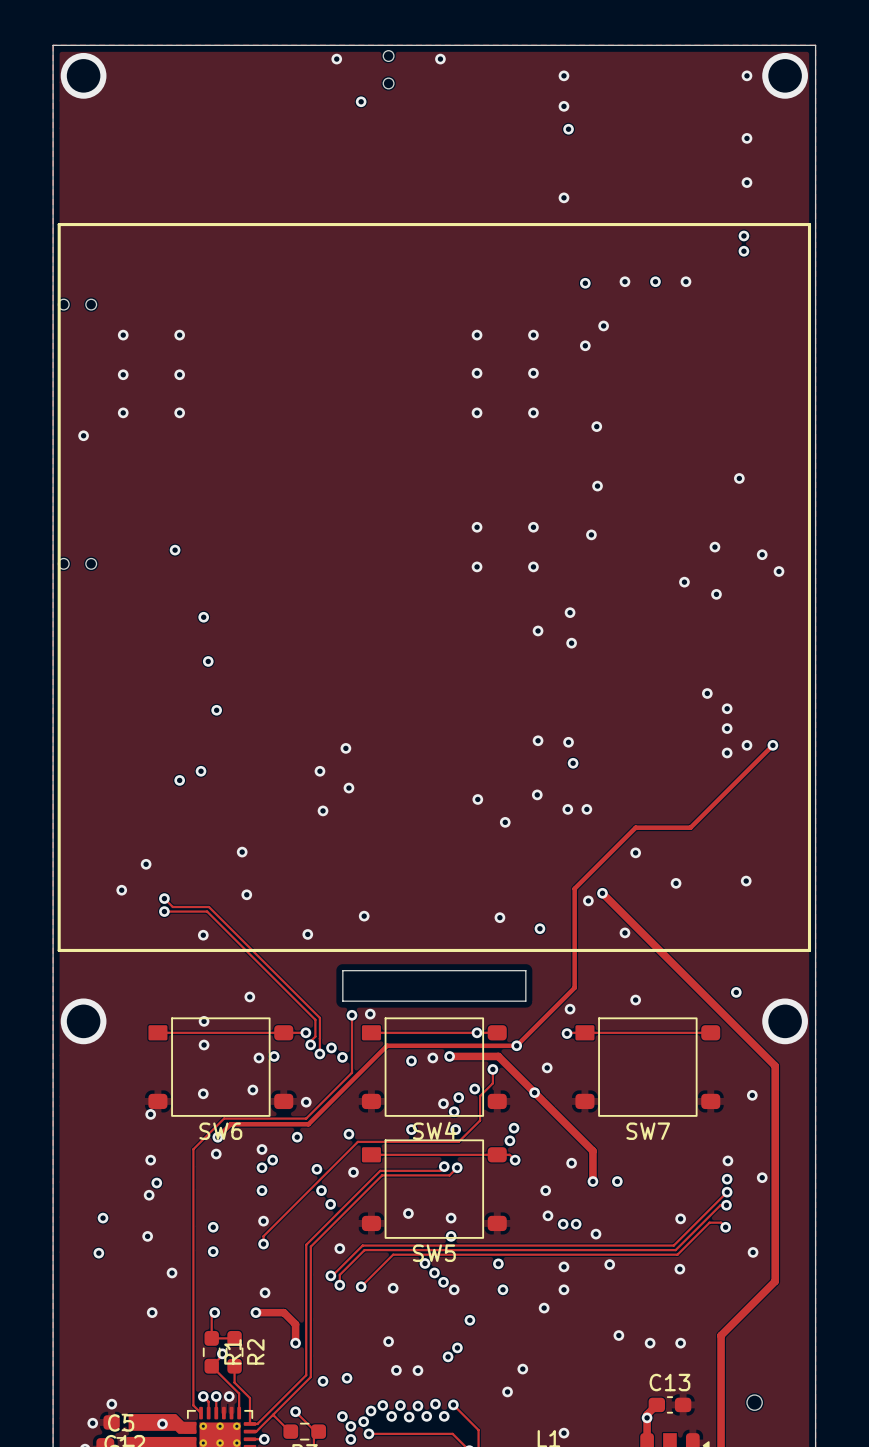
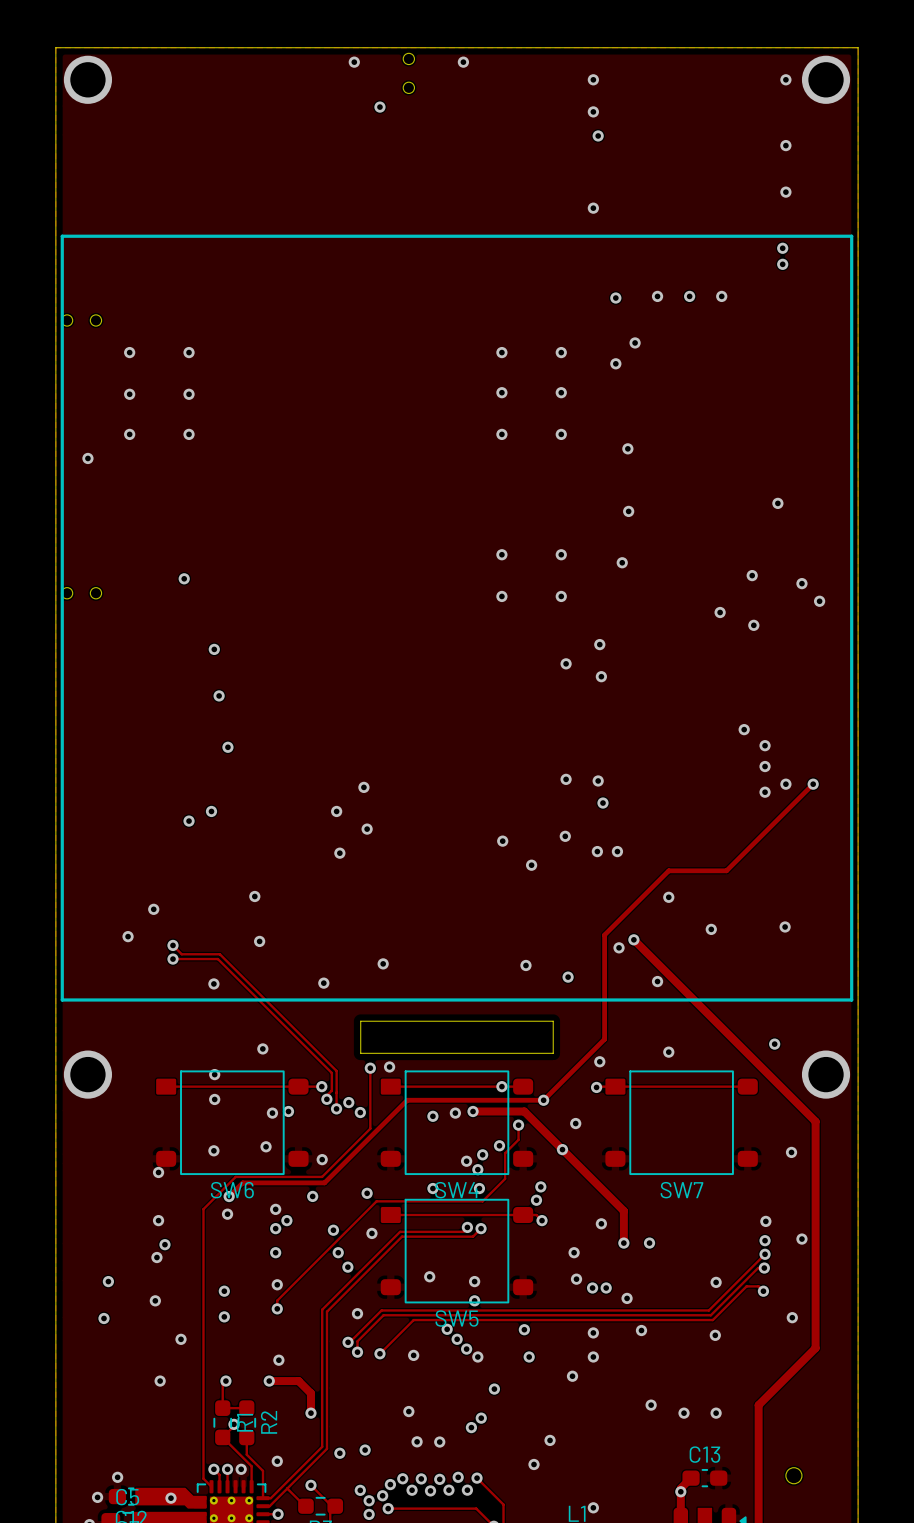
via: none -> (277, 1461)

